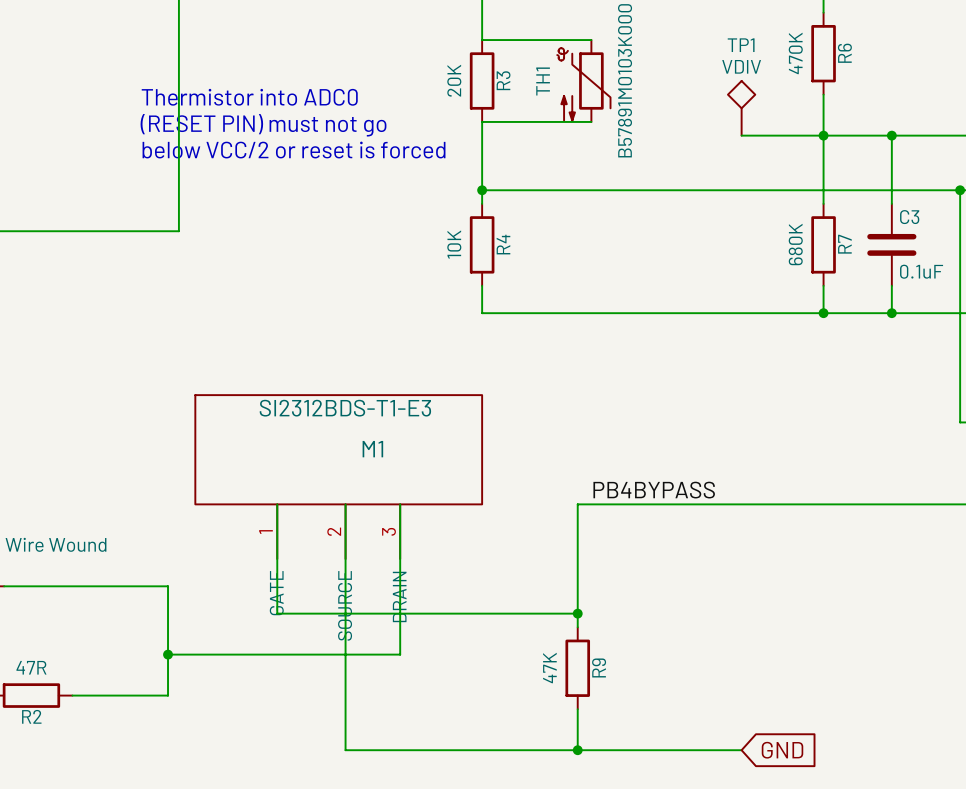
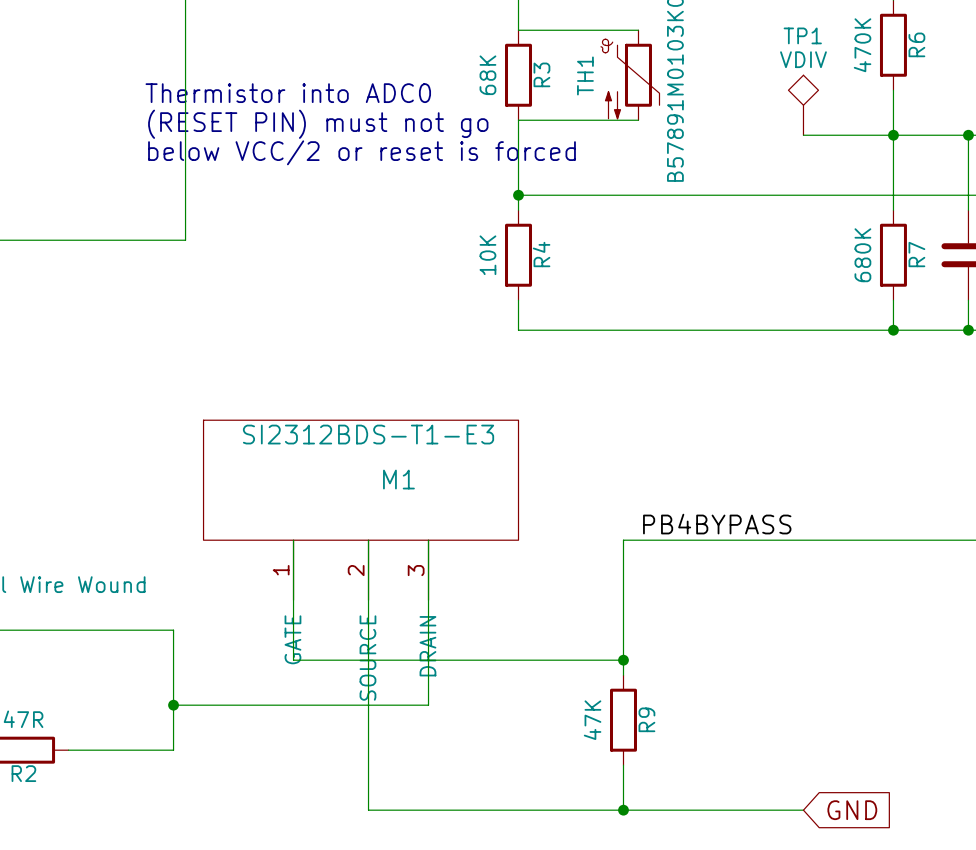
R3 value: 20K (454, 80) -> 68K (487, 75)

